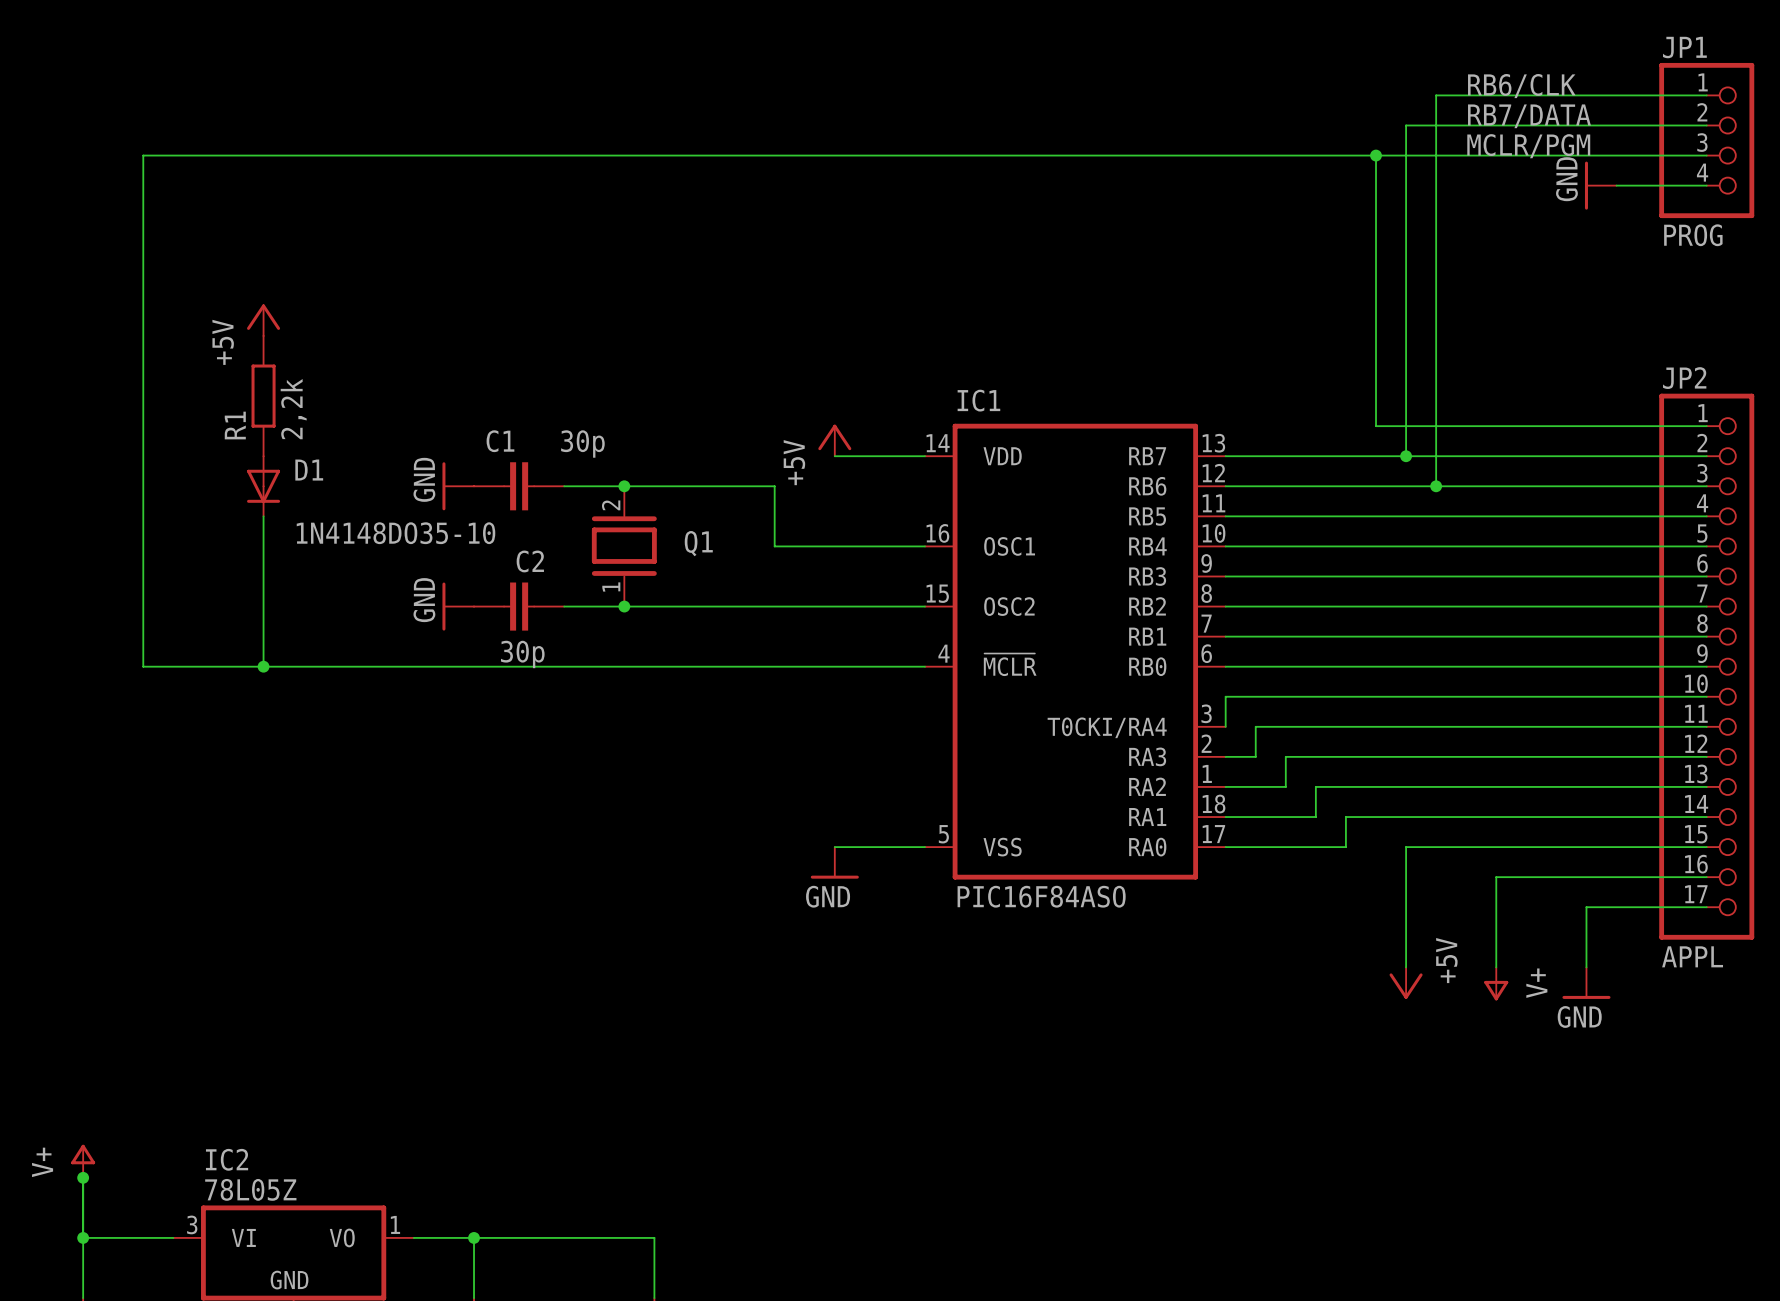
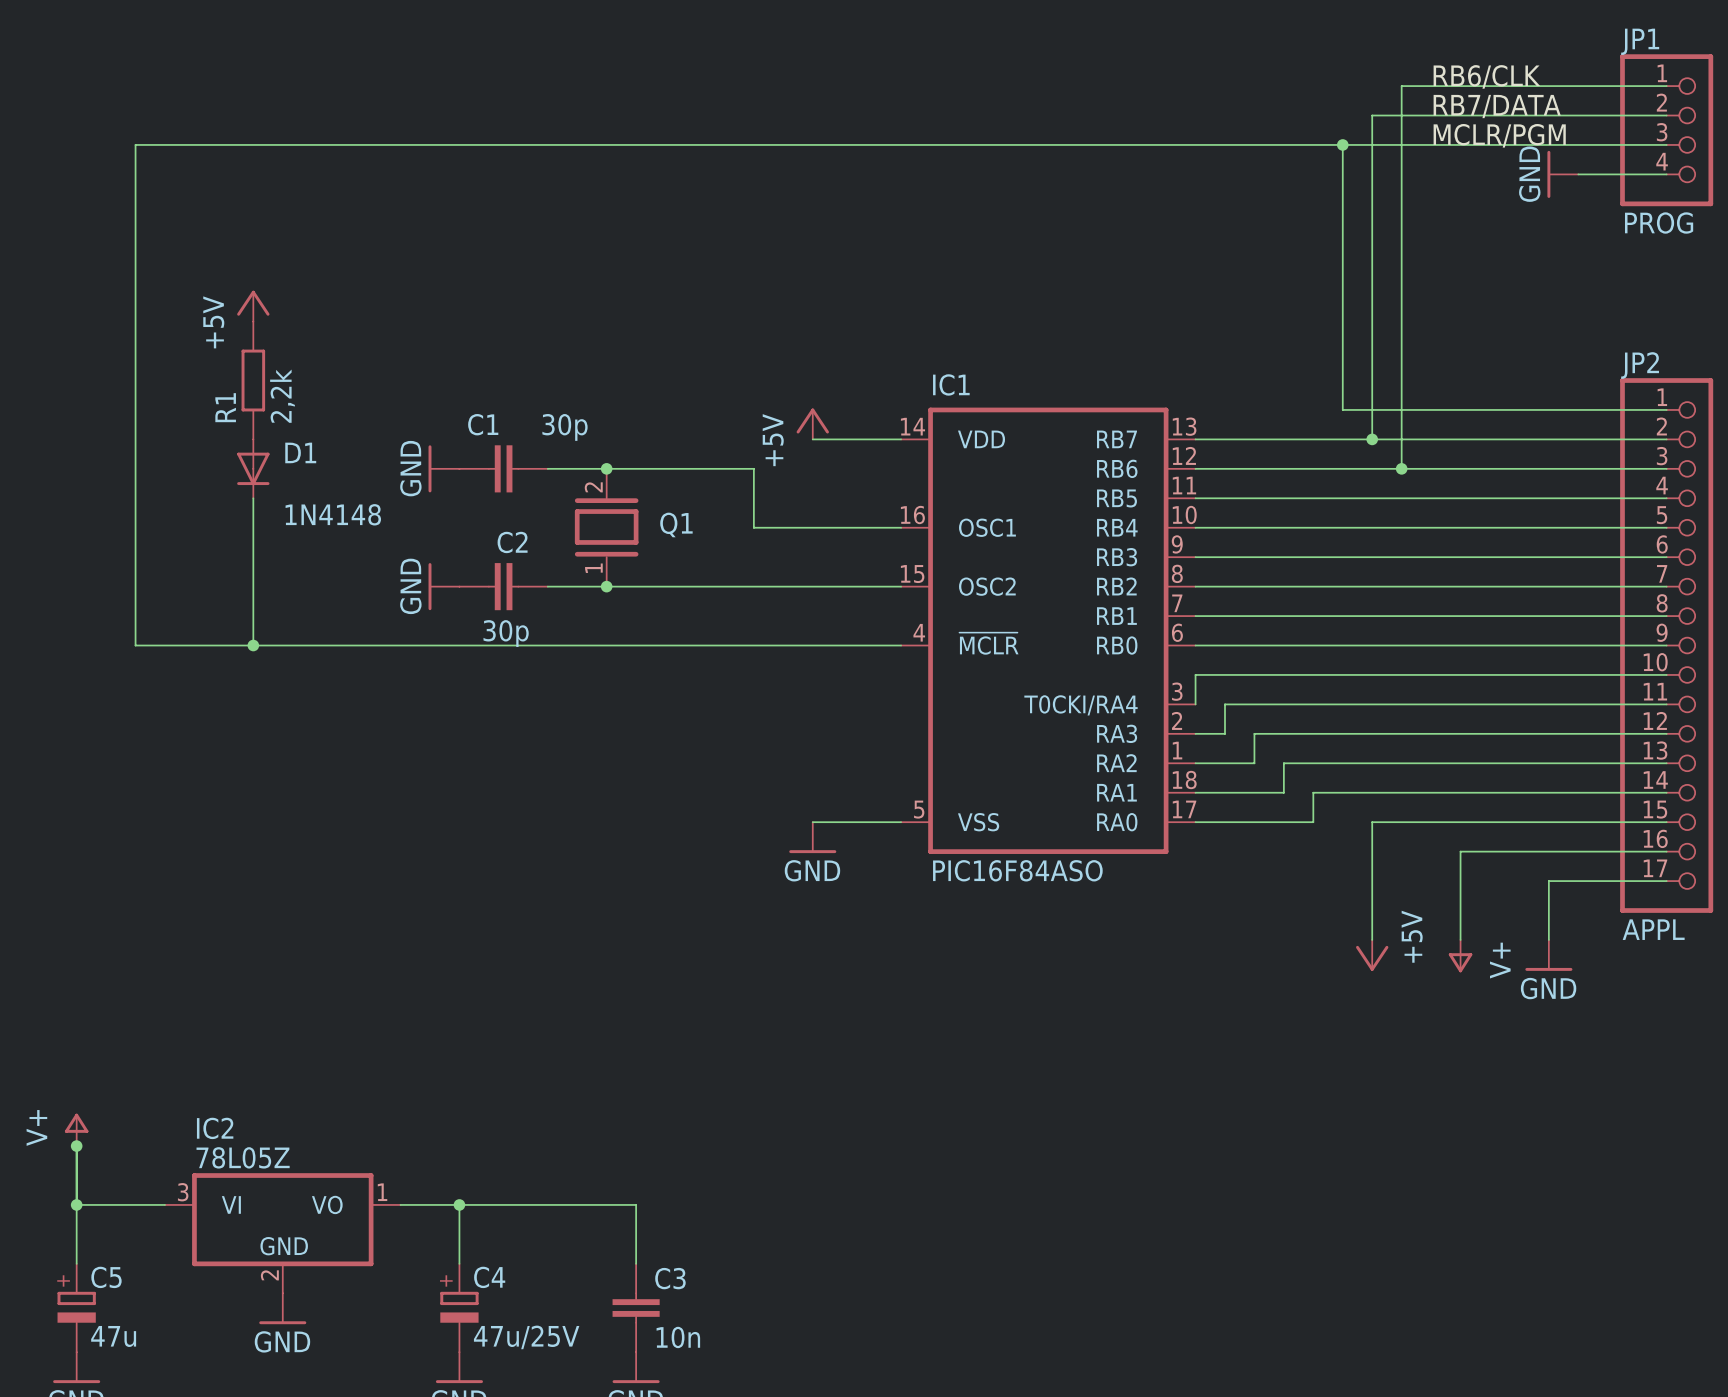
D1 value: 1N4148DO35-10 (396, 533) -> 1N4148 (333, 514)

